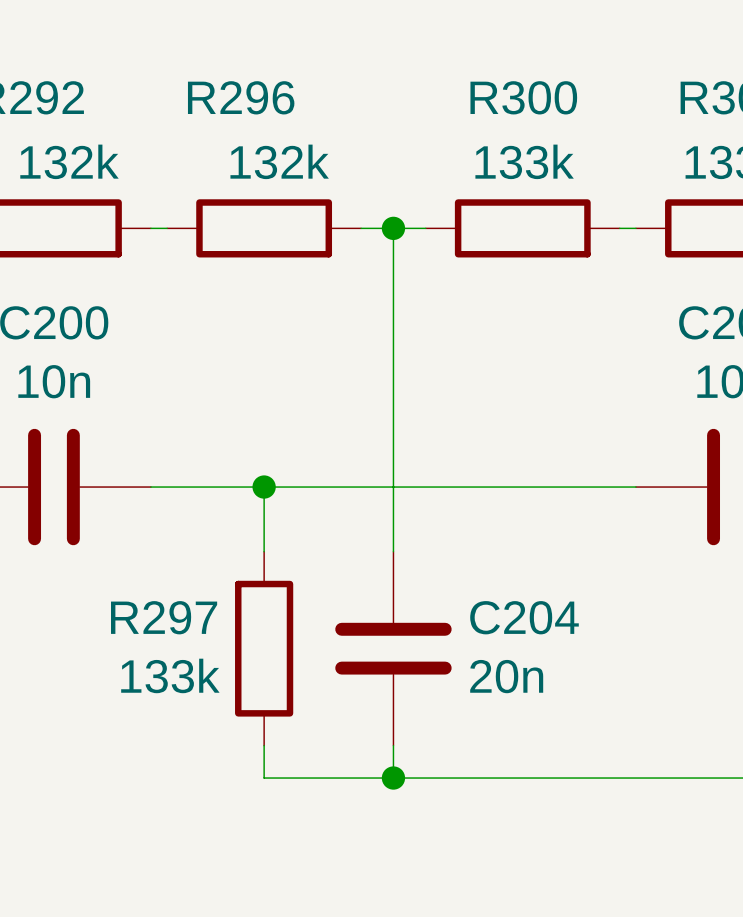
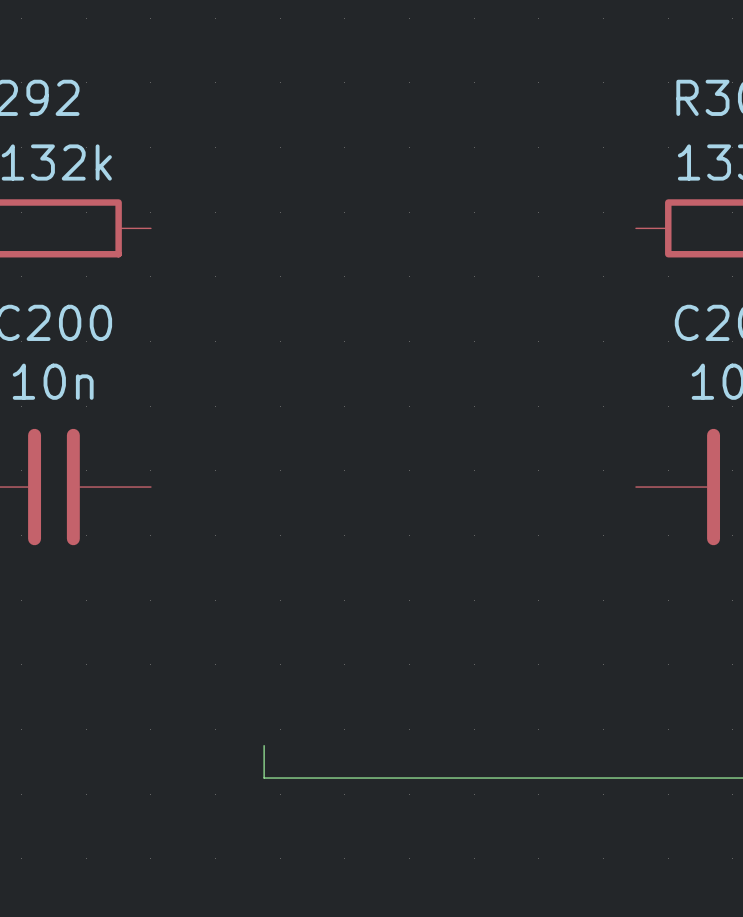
wire: (150, 228) (167, 228) -> none
R296: 132k (264, 228) -> none
wire: (361, 228) (425, 228) -> none
wire: (393, 228) (393, 551) -> none
junction: (393, 228) -> none
R300: 133k (522, 228) -> none
wire: (619, 228) (635, 228) -> none
wire: (150, 487) (635, 487) -> none
wire: (264, 487) (264, 551) -> none
junction: (264, 487) -> none
R297: 133k (264, 648) -> none
C204: 20n (393, 648) -> none
wire: (393, 745) (393, 778) -> none
junction: (393, 778) -> none

